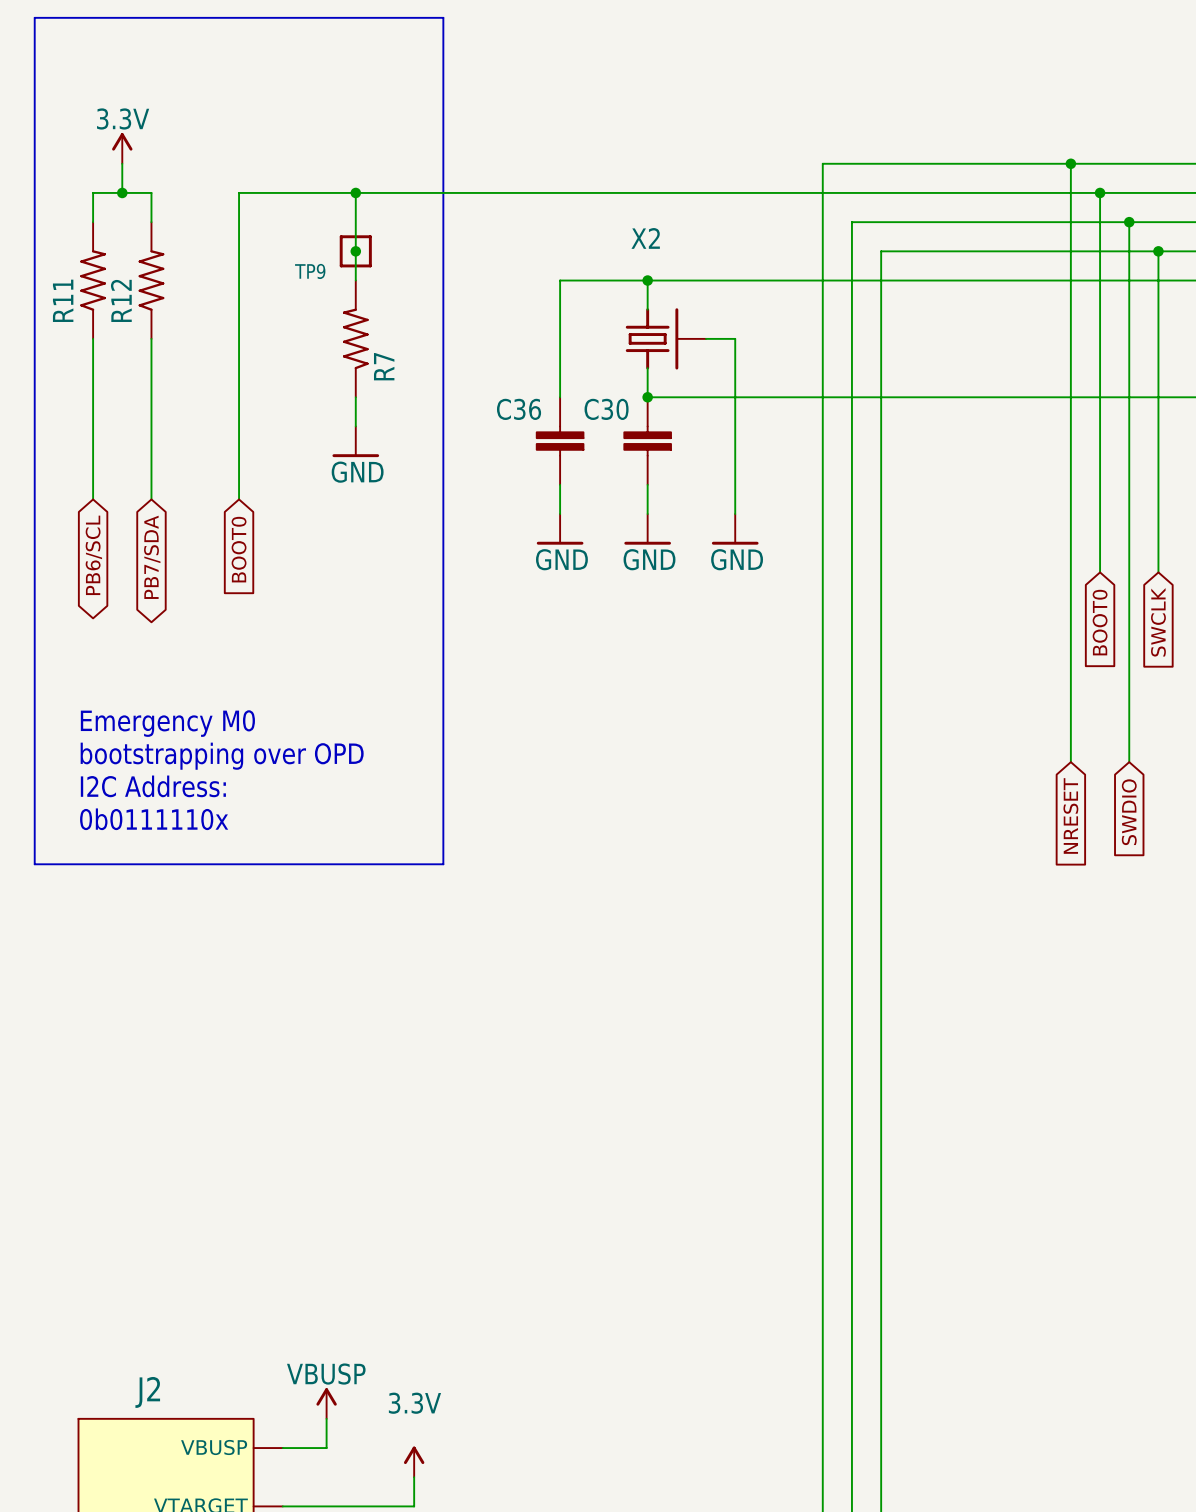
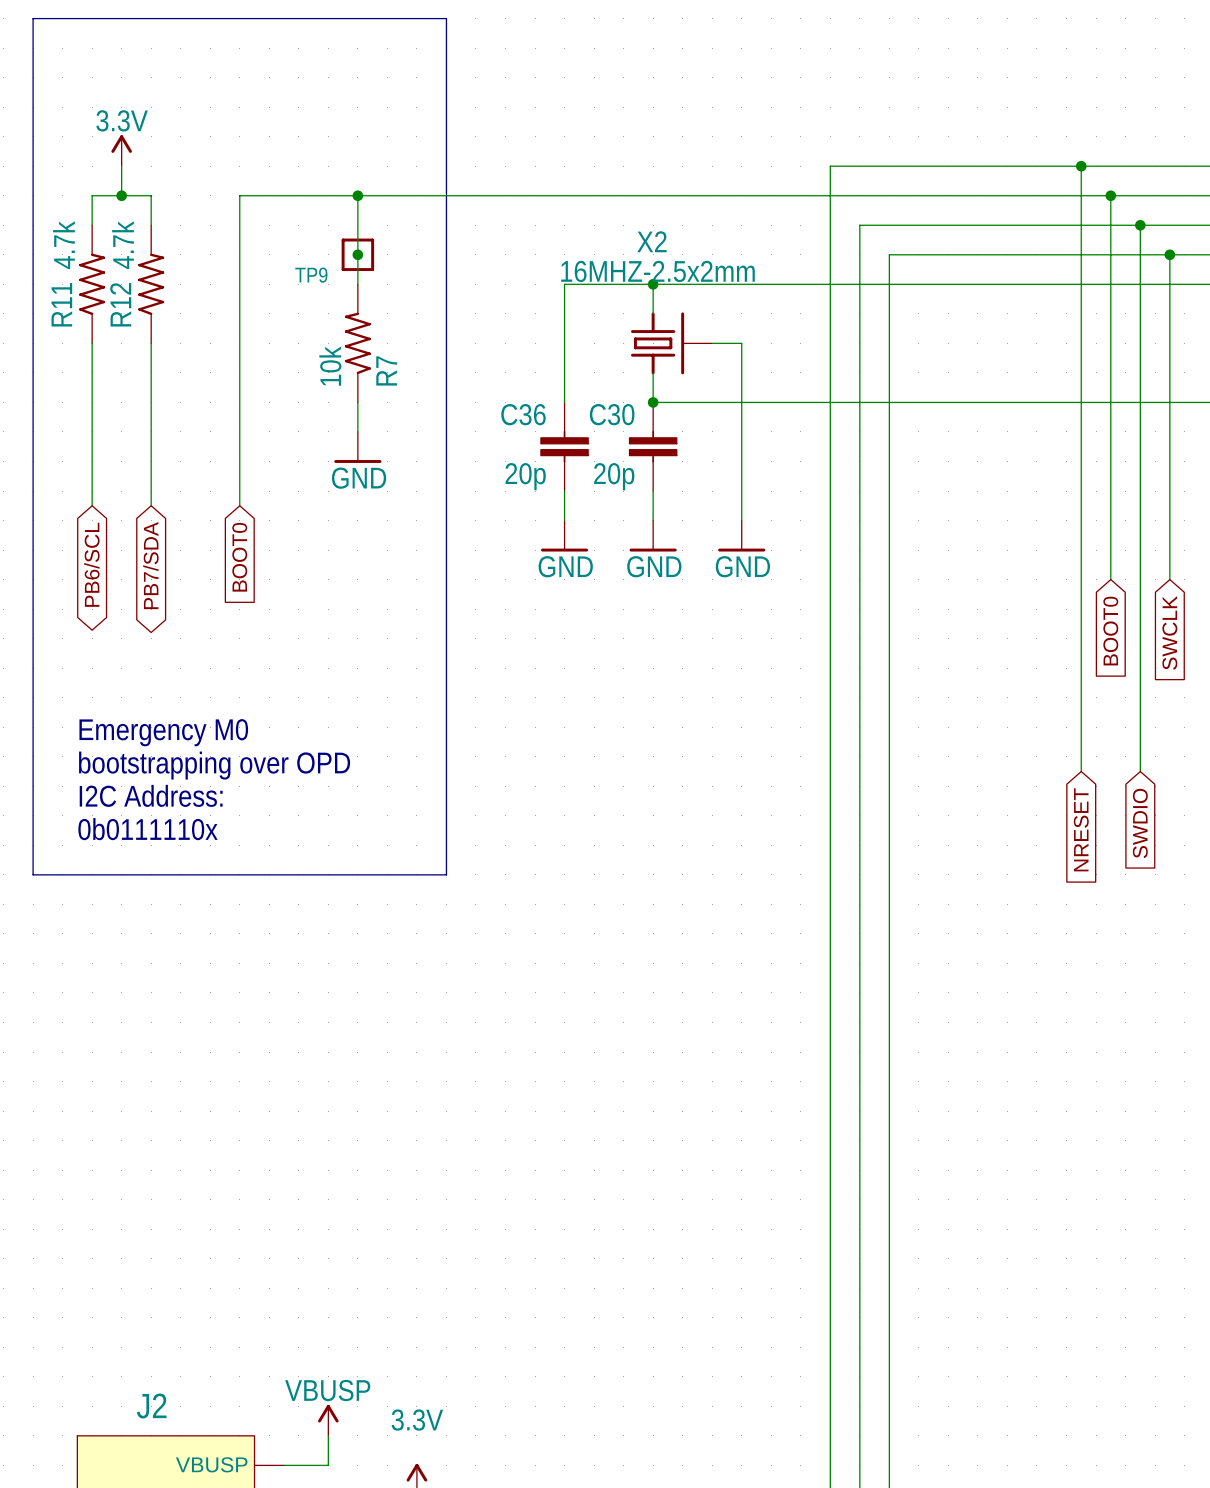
R11 value: none -> 4.7k (63, 245)
R12 value: none -> 4.7k (123, 245)
X2 value: none -> 16MHZ-2.5x2mm (657, 271)
R7 value: none -> 10k (330, 366)
C36 value: none -> 20p (525, 476)
C30 value: none -> 20p (614, 476)

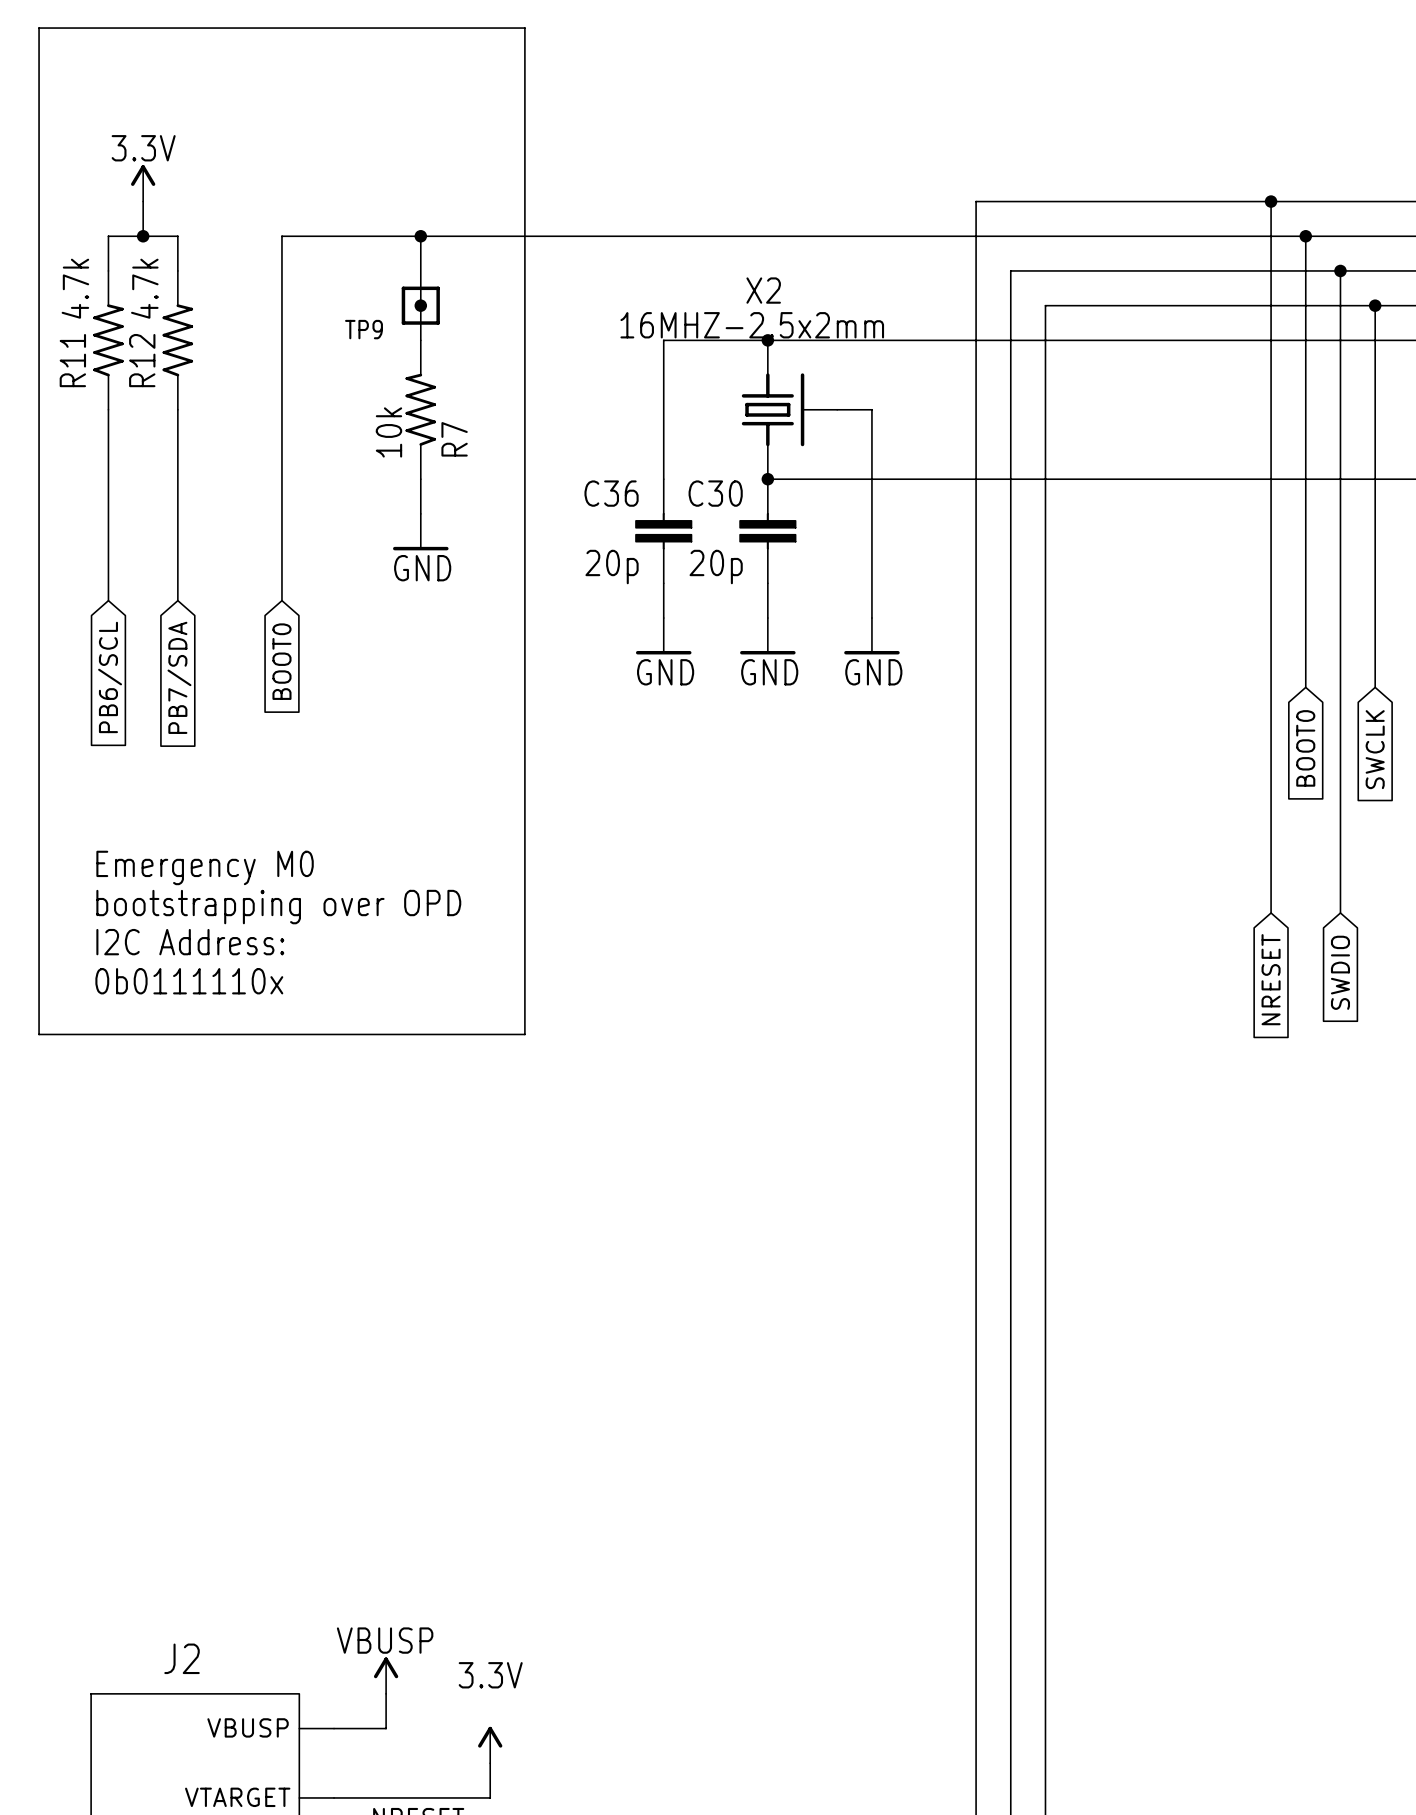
global label shape: bidirectional (91, 564) -> input (110, 677)
global label shape: bidirectional (150, 565) -> input (179, 677)

